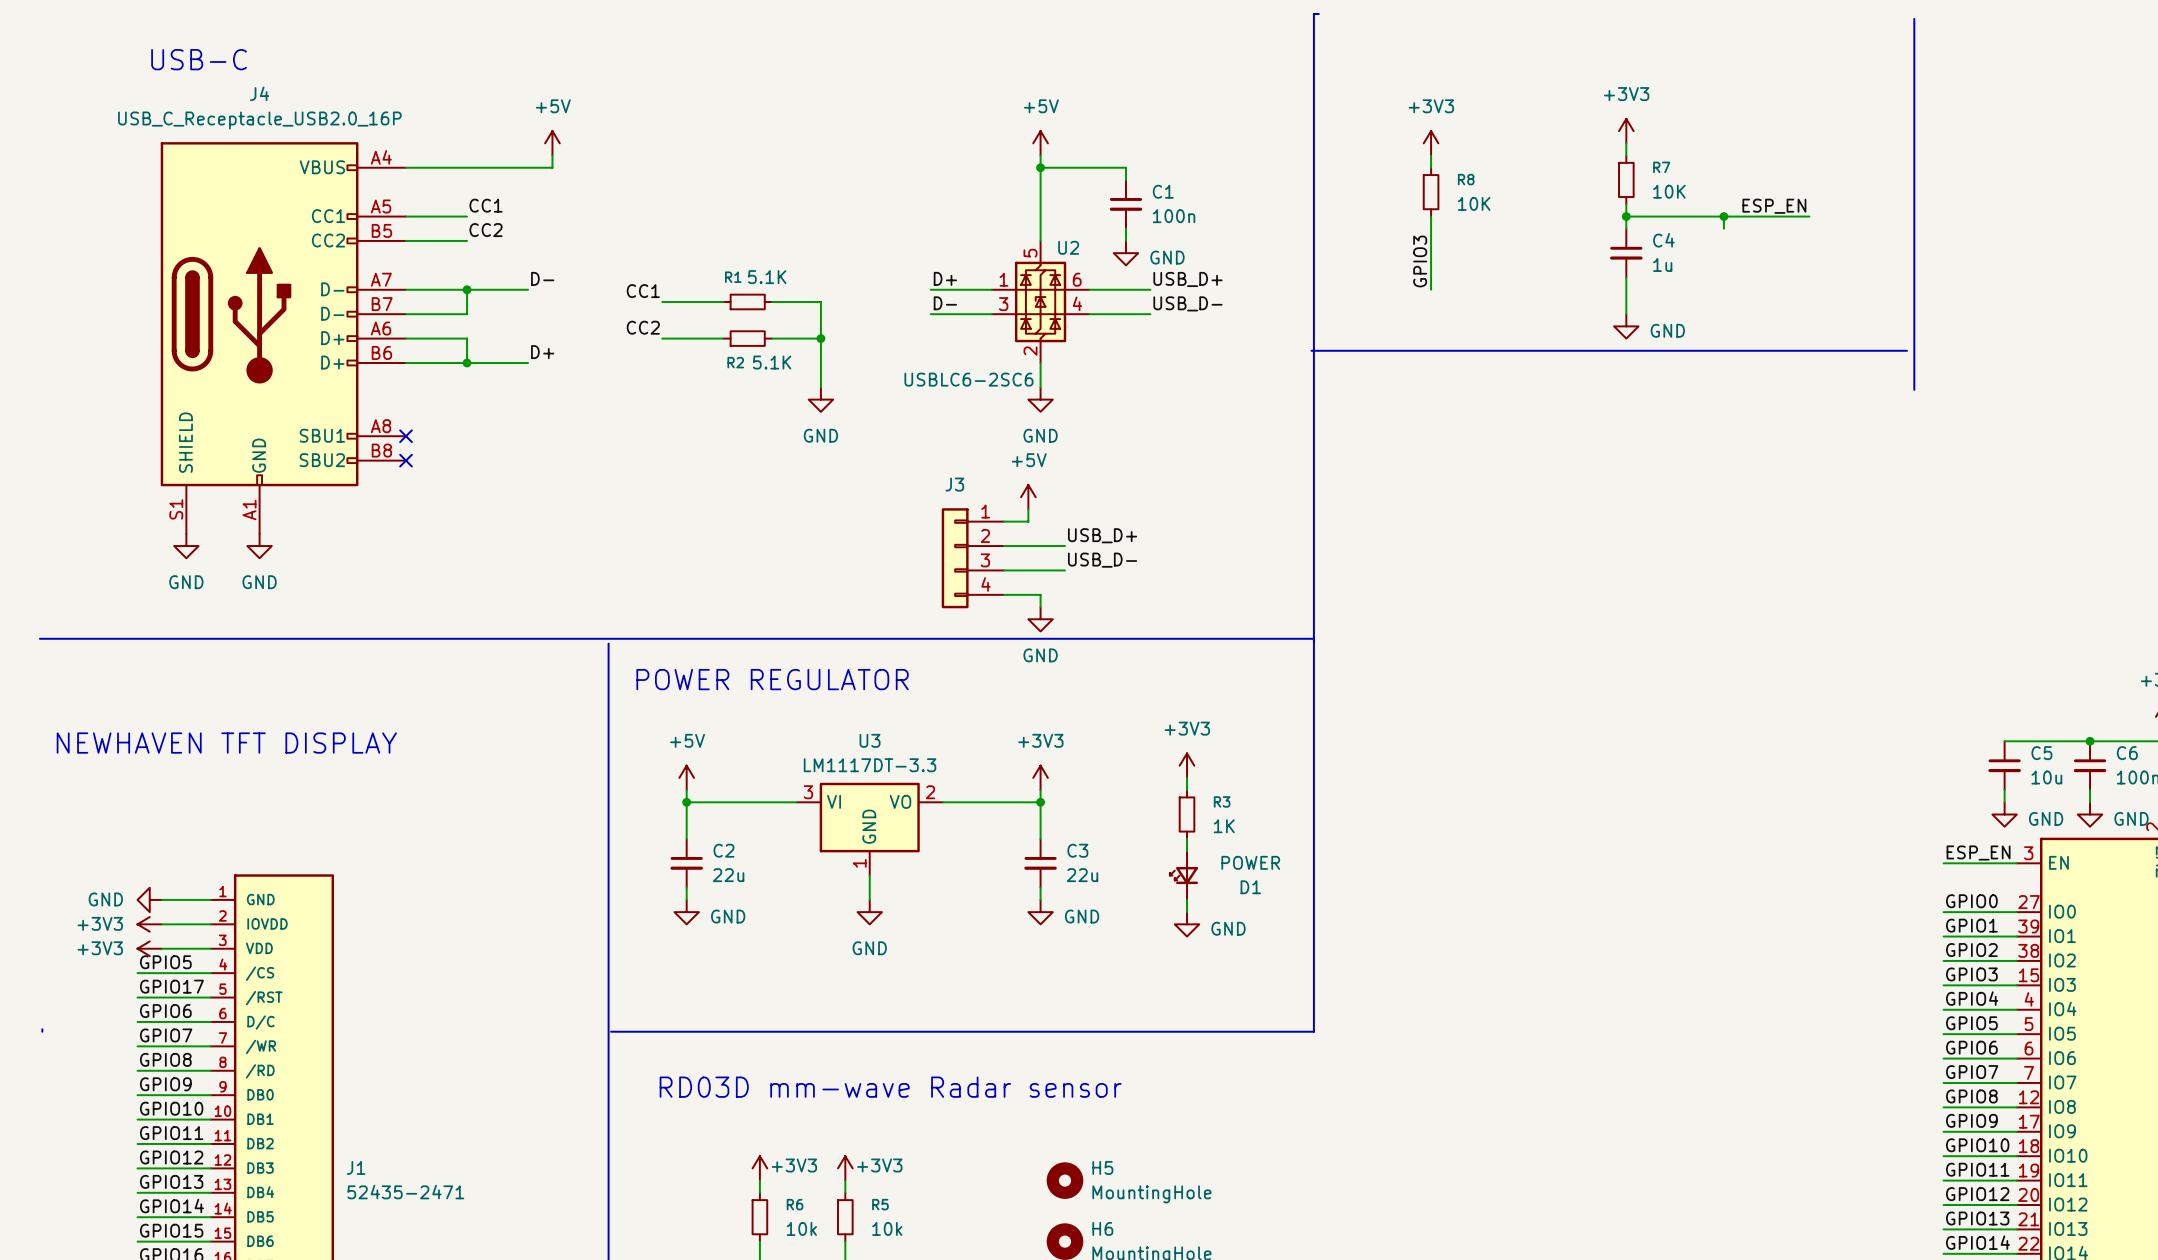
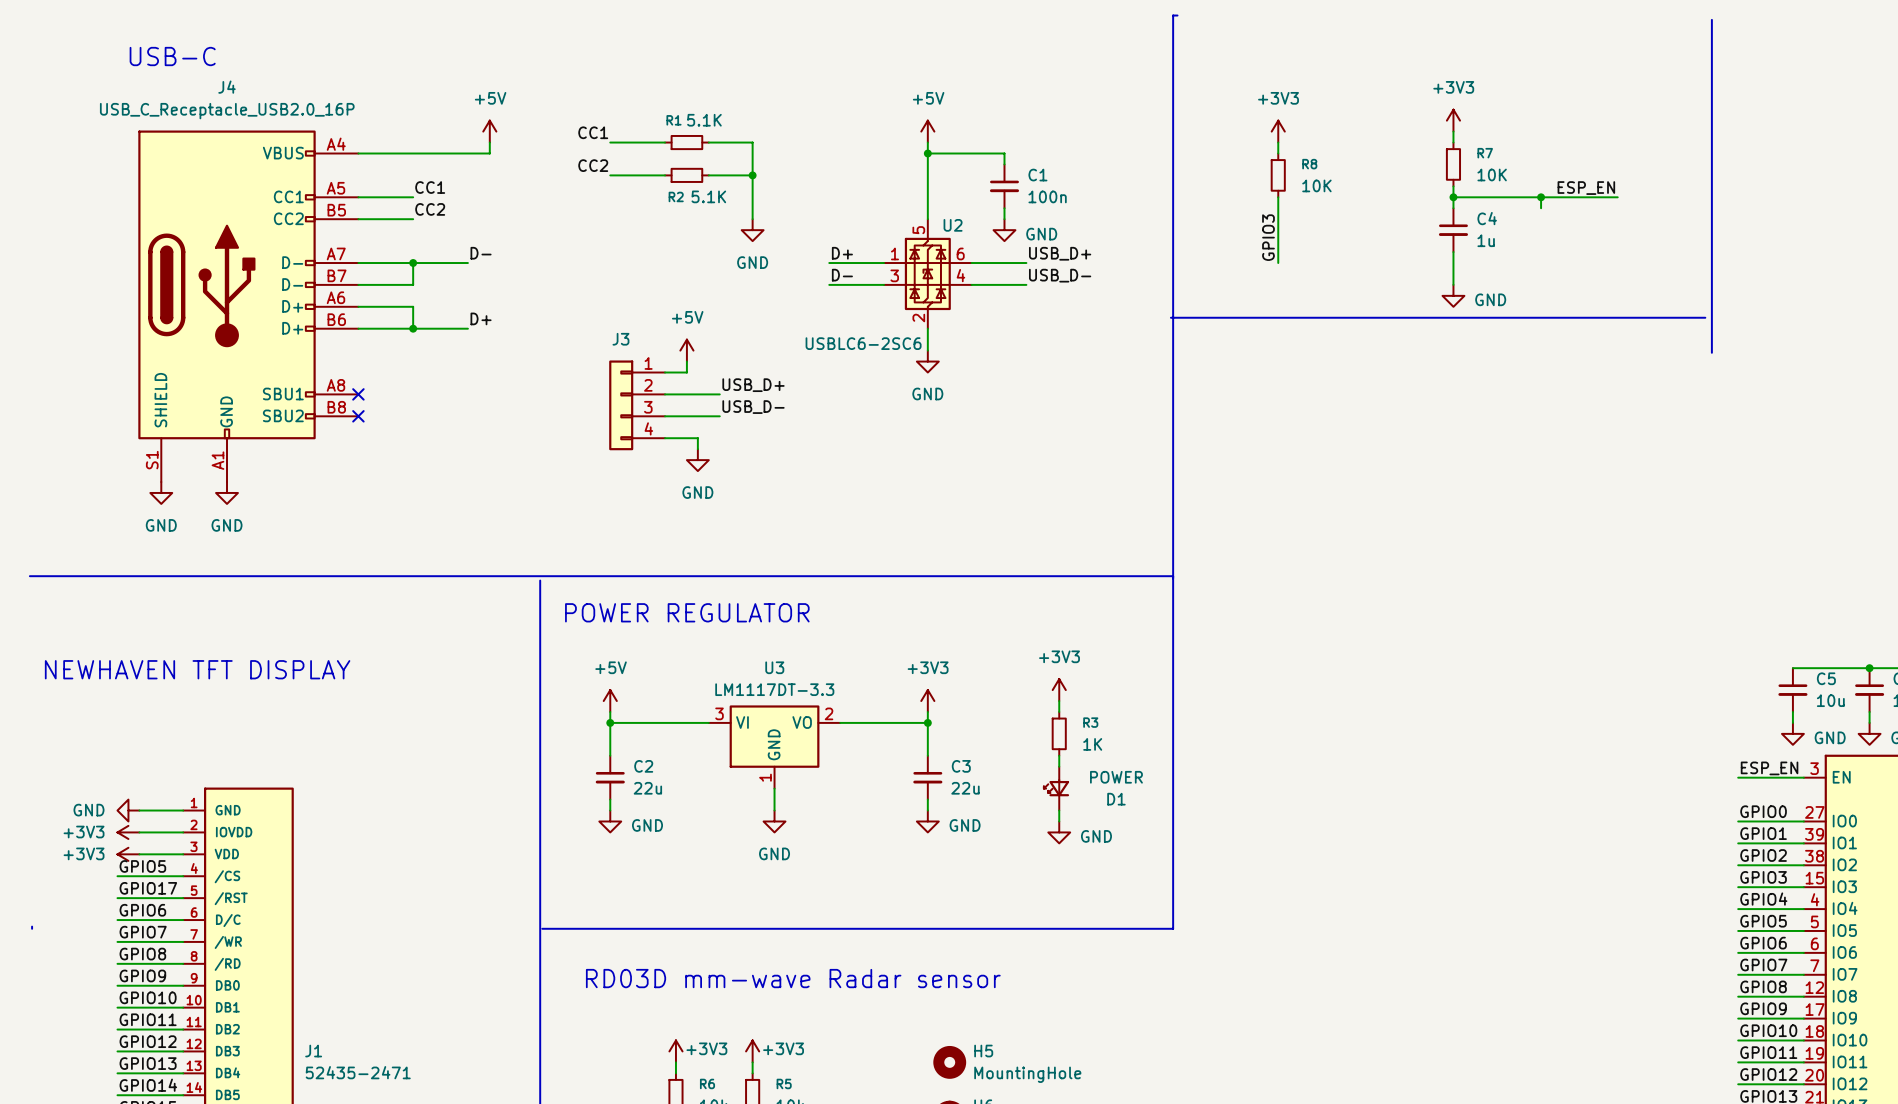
junction: none -> (752, 175)
power symbol: none -> GND (752, 230)
label position: CC1 (643, 291) -> CC1 (593, 132)
wire: (662, 301) (723, 301) -> (610, 142) (665, 142)
R1 position: (747, 301) -> (686, 142)
wire: (772, 301) (820, 301) (820, 387) -> (708, 142) (752, 142) (752, 219)
label position: CC2 (643, 327) -> CC2 (593, 165)
wire: (662, 338) (723, 338) -> (610, 175) (665, 175)
R2 position: (747, 338) -> (686, 175)
wire: (772, 338) (820, 338) -> (708, 175) (752, 175)
junction: (820, 338) -> none
power symbol: none -> +5V (686, 350)
wire: none -> (686, 361) (686, 372) (665, 372)
power symbol: GND (820, 399) -> none
label: none -> USB_D+ (753, 385)
wire: none -> (665, 394) (719, 394)
label: none -> USB_D- (753, 407)
wire: none -> (665, 416) (719, 416)
wire: none -> (665, 438) (697, 438) (697, 449)
power symbol: +5V (1028, 497) -> none
power symbol: none -> GND (697, 460)
wire: (1028, 509) (1028, 521) (1003, 521) -> none
label: USB_D+ (1102, 535) -> none
wire: (1003, 546) (1064, 546) -> none
J3 position: (972, 558) -> (637, 405)
label: USB_D- (1102, 560) -> none
wire: (1003, 570) (1064, 570) -> none
wire: (1003, 594) (1040, 594) (1040, 607) -> none
power symbol: GND (1040, 619) -> none

